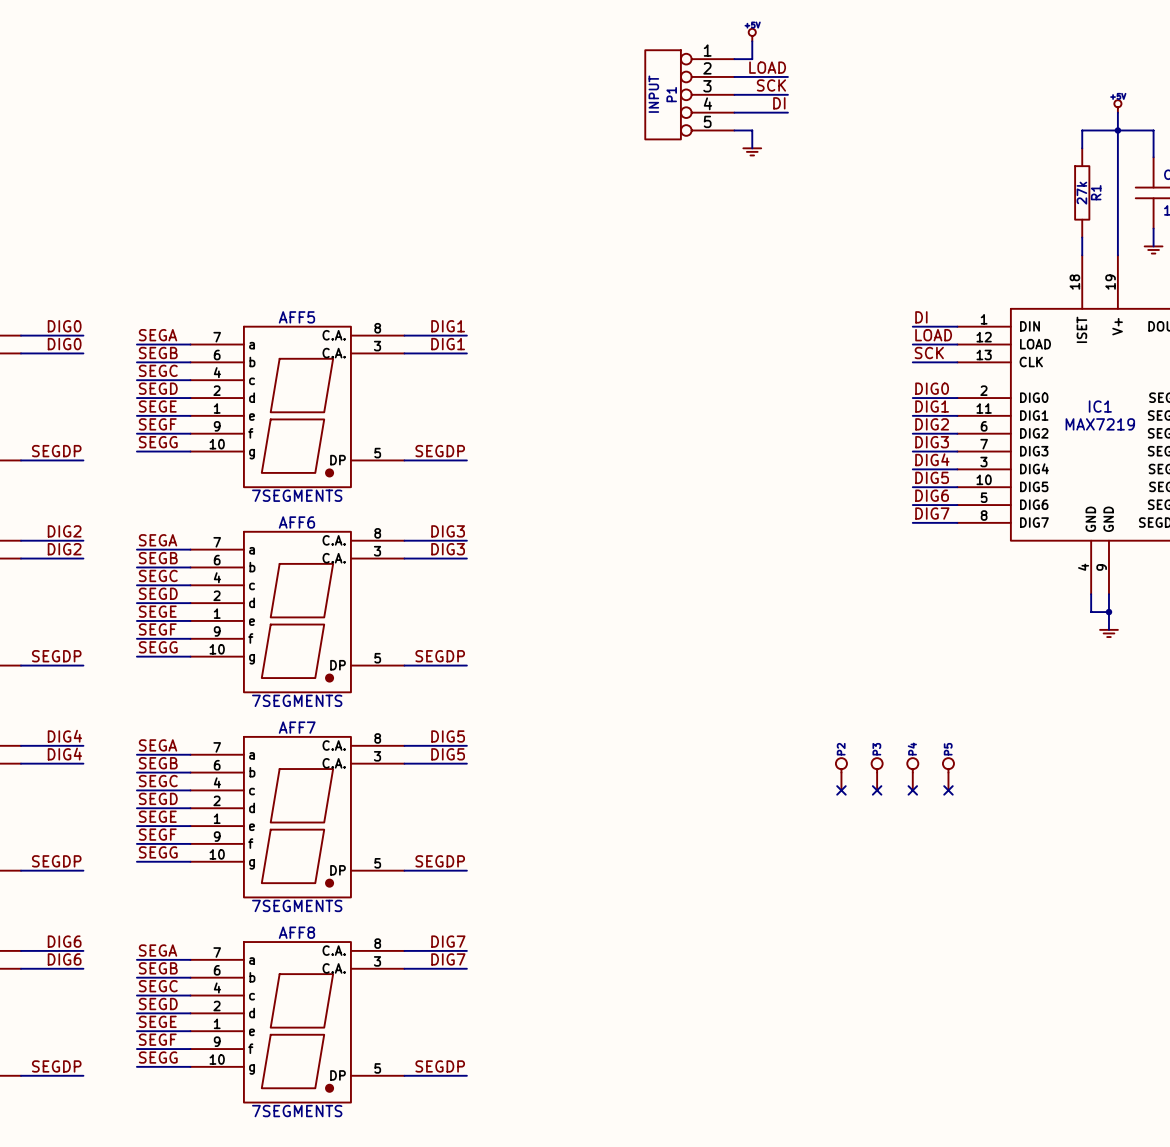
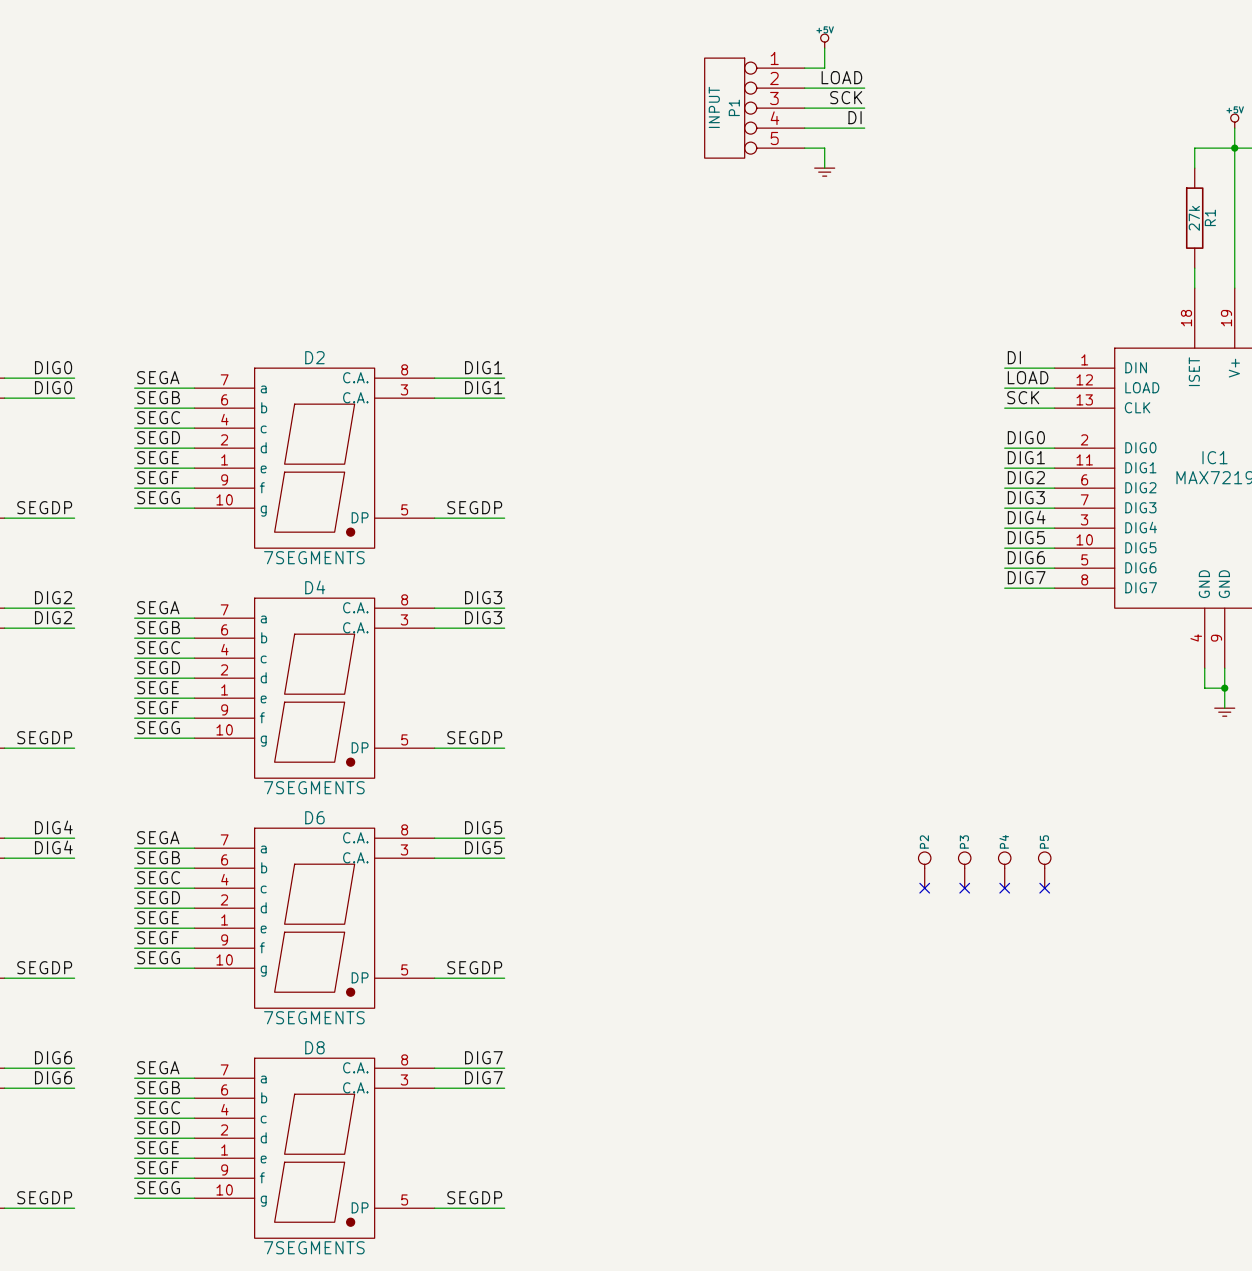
AFF5 name: AFF5 (296, 317) -> D2 (314, 357)
AFF6 name: AFF6 (296, 522) -> D4 (315, 587)
AFF7 name: AFF7 (297, 727) -> D6 (314, 817)
AFF8 name: AFF8 (296, 932) -> D8 (314, 1047)

